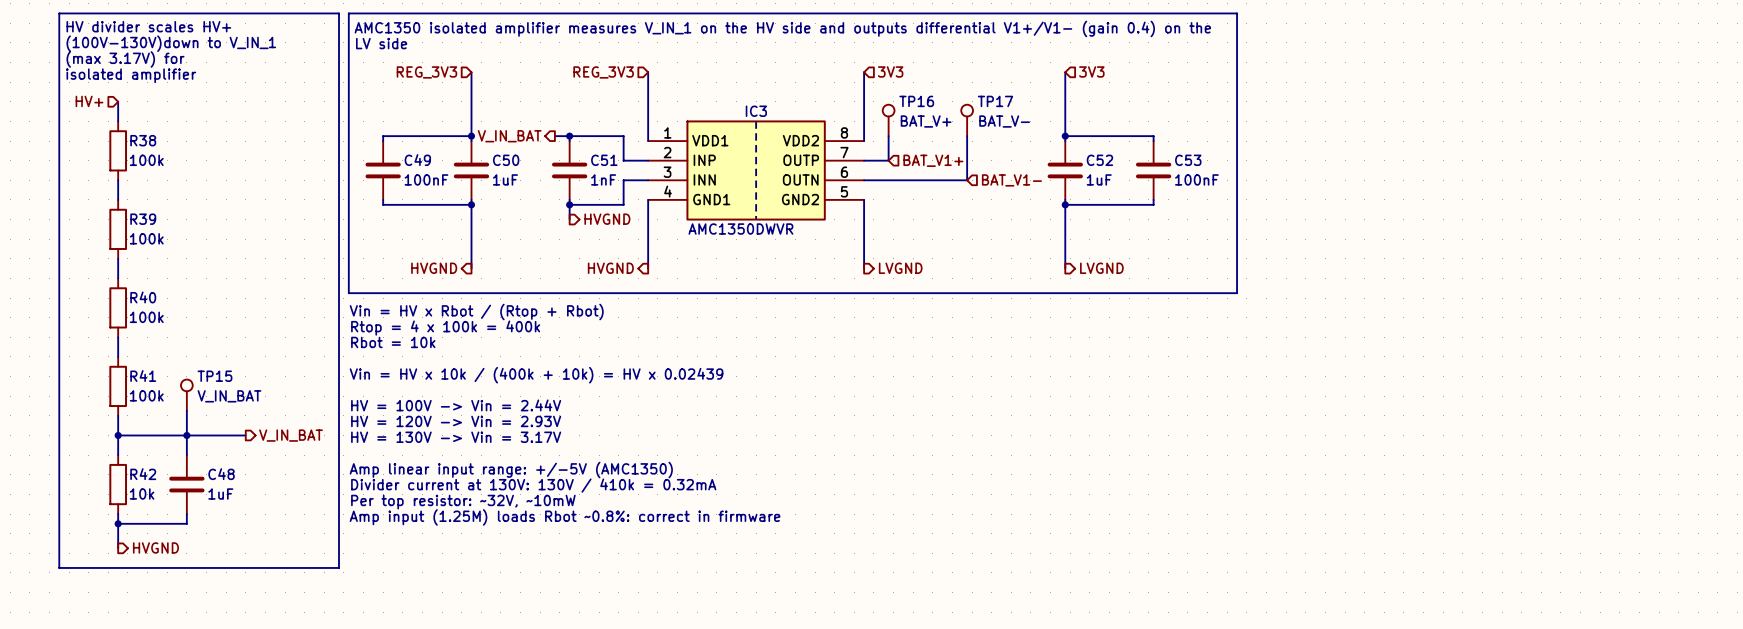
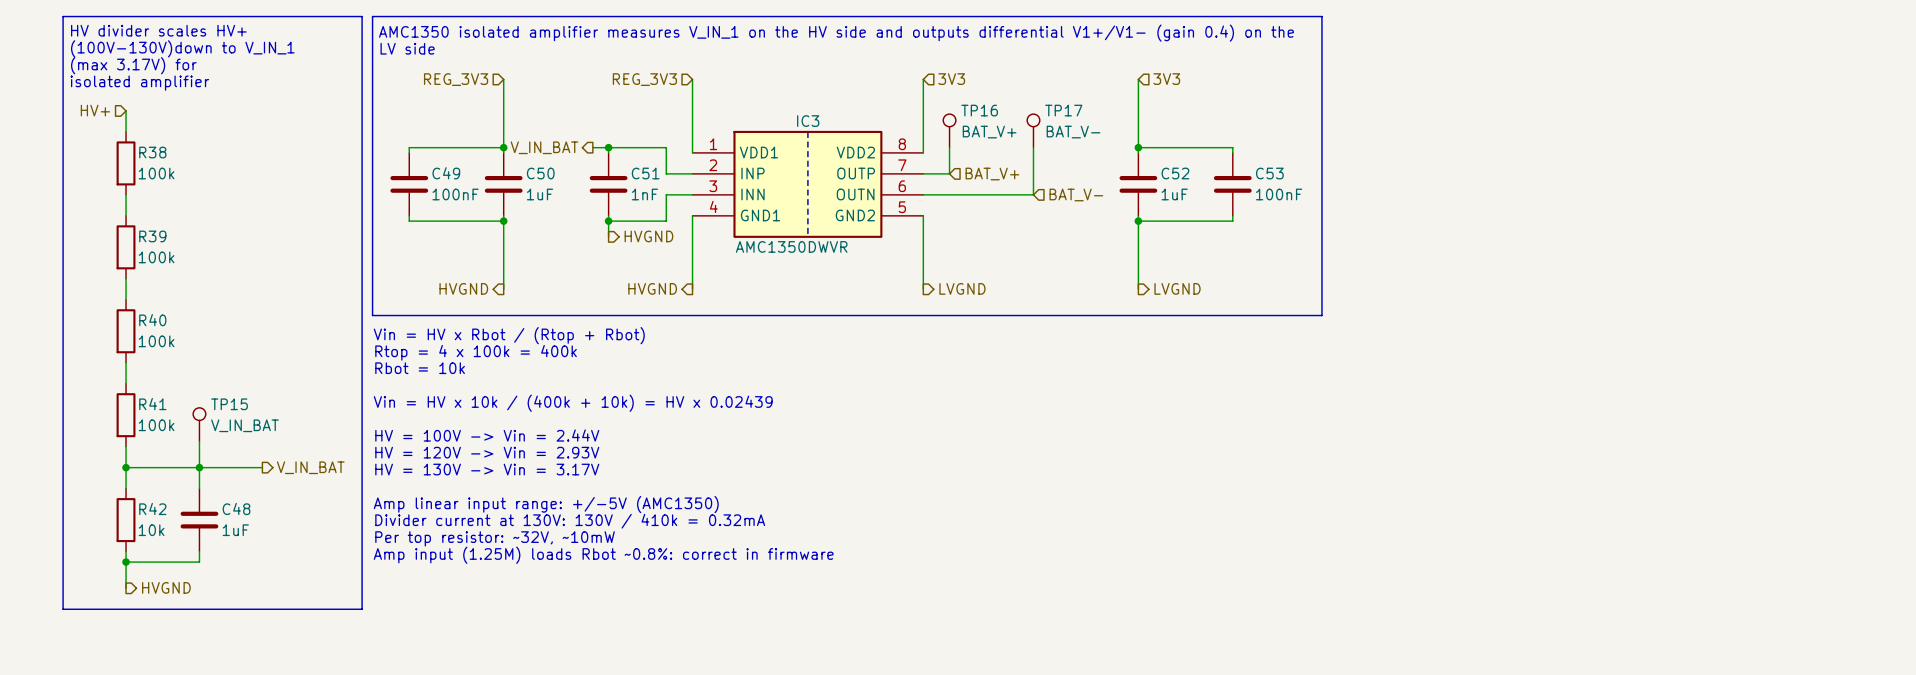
hierarchical label: BAT_V1+ (933, 160) -> BAT_V+ (992, 174)
hierarchical label: BAT_V1- (1011, 180) -> BAT_V- (1076, 194)

